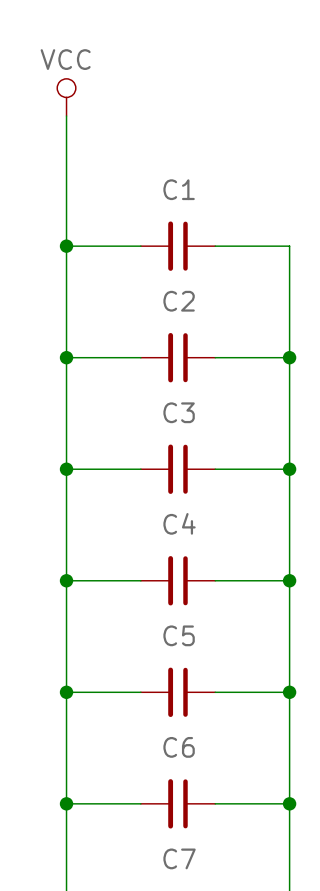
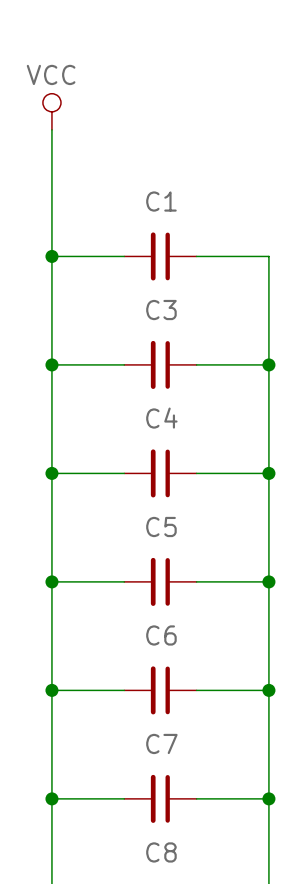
C2 name: C2 (179, 301) -> C3 (161, 310)
C3 name: C3 (179, 412) -> C4 (161, 418)
C4 name: C4 (179, 523) -> C5 (161, 526)
C5 name: C5 (179, 635) -> C6 (161, 635)
C6 name: C6 (179, 747) -> C7 (161, 743)
C7 name: C7 (179, 858) -> C8 (161, 852)

